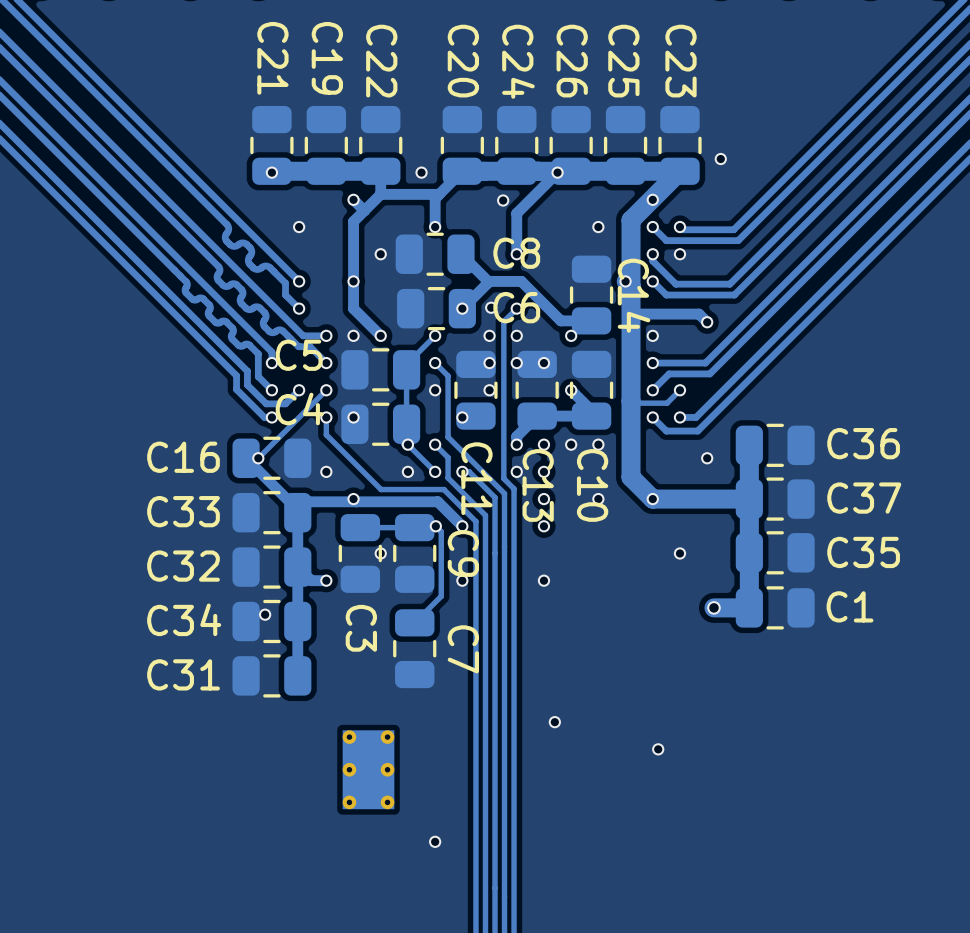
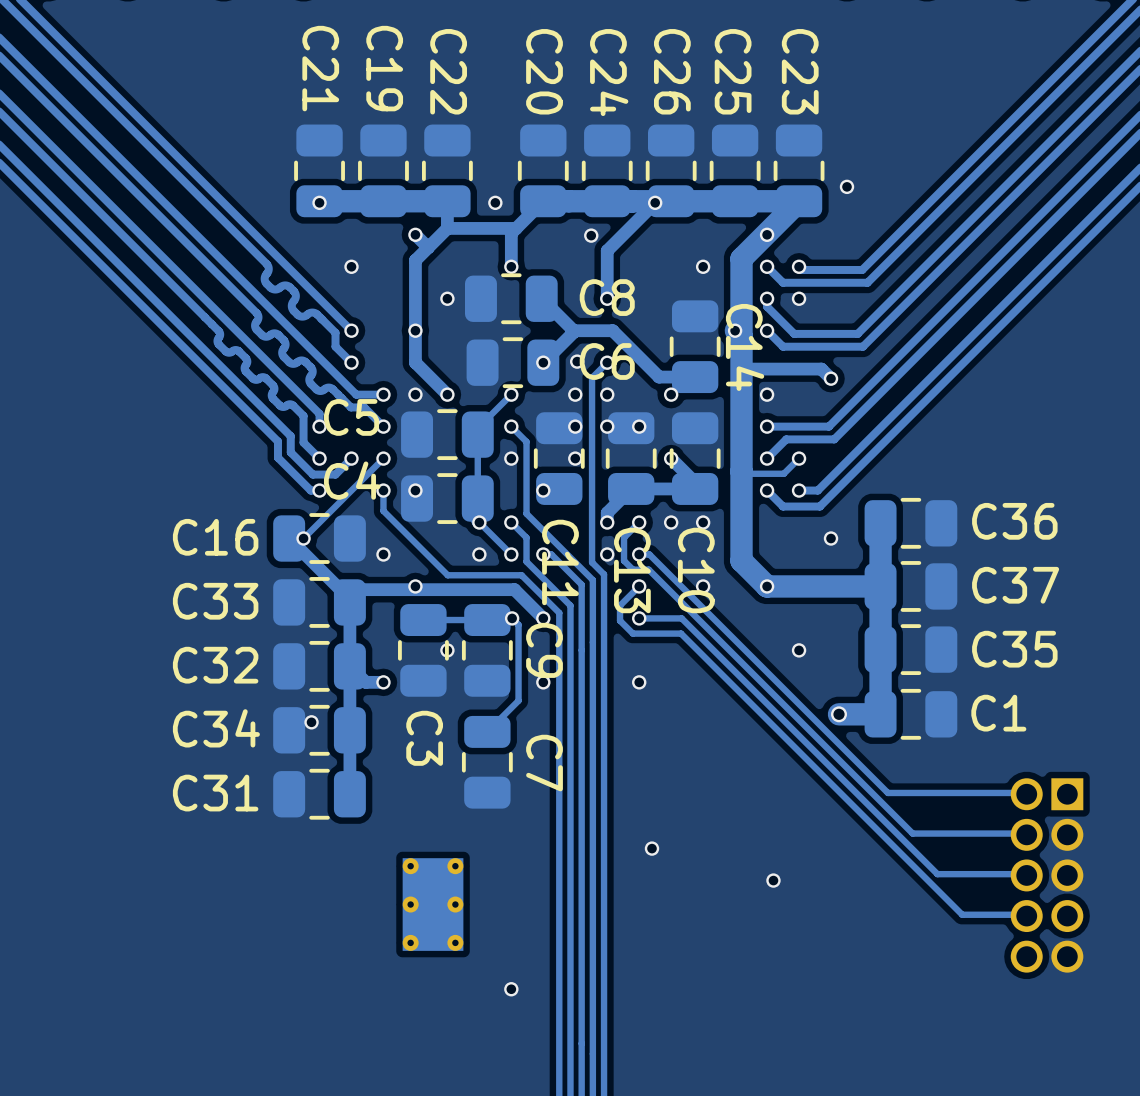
track: none -> (639, 522) (624, 537) (624, 560) (632, 569) (648, 569) (912, 833) (1022, 833)
track: none -> (639, 554) (649, 554) (887, 792) (1022, 792)
track: none -> (639, 586) (620, 605) (620, 620) (632, 633) (681, 633) (962, 914) (1022, 914)
track: none -> (639, 618) (681, 618) (937, 874) (1022, 874)
part: none -> (1047, 875)

